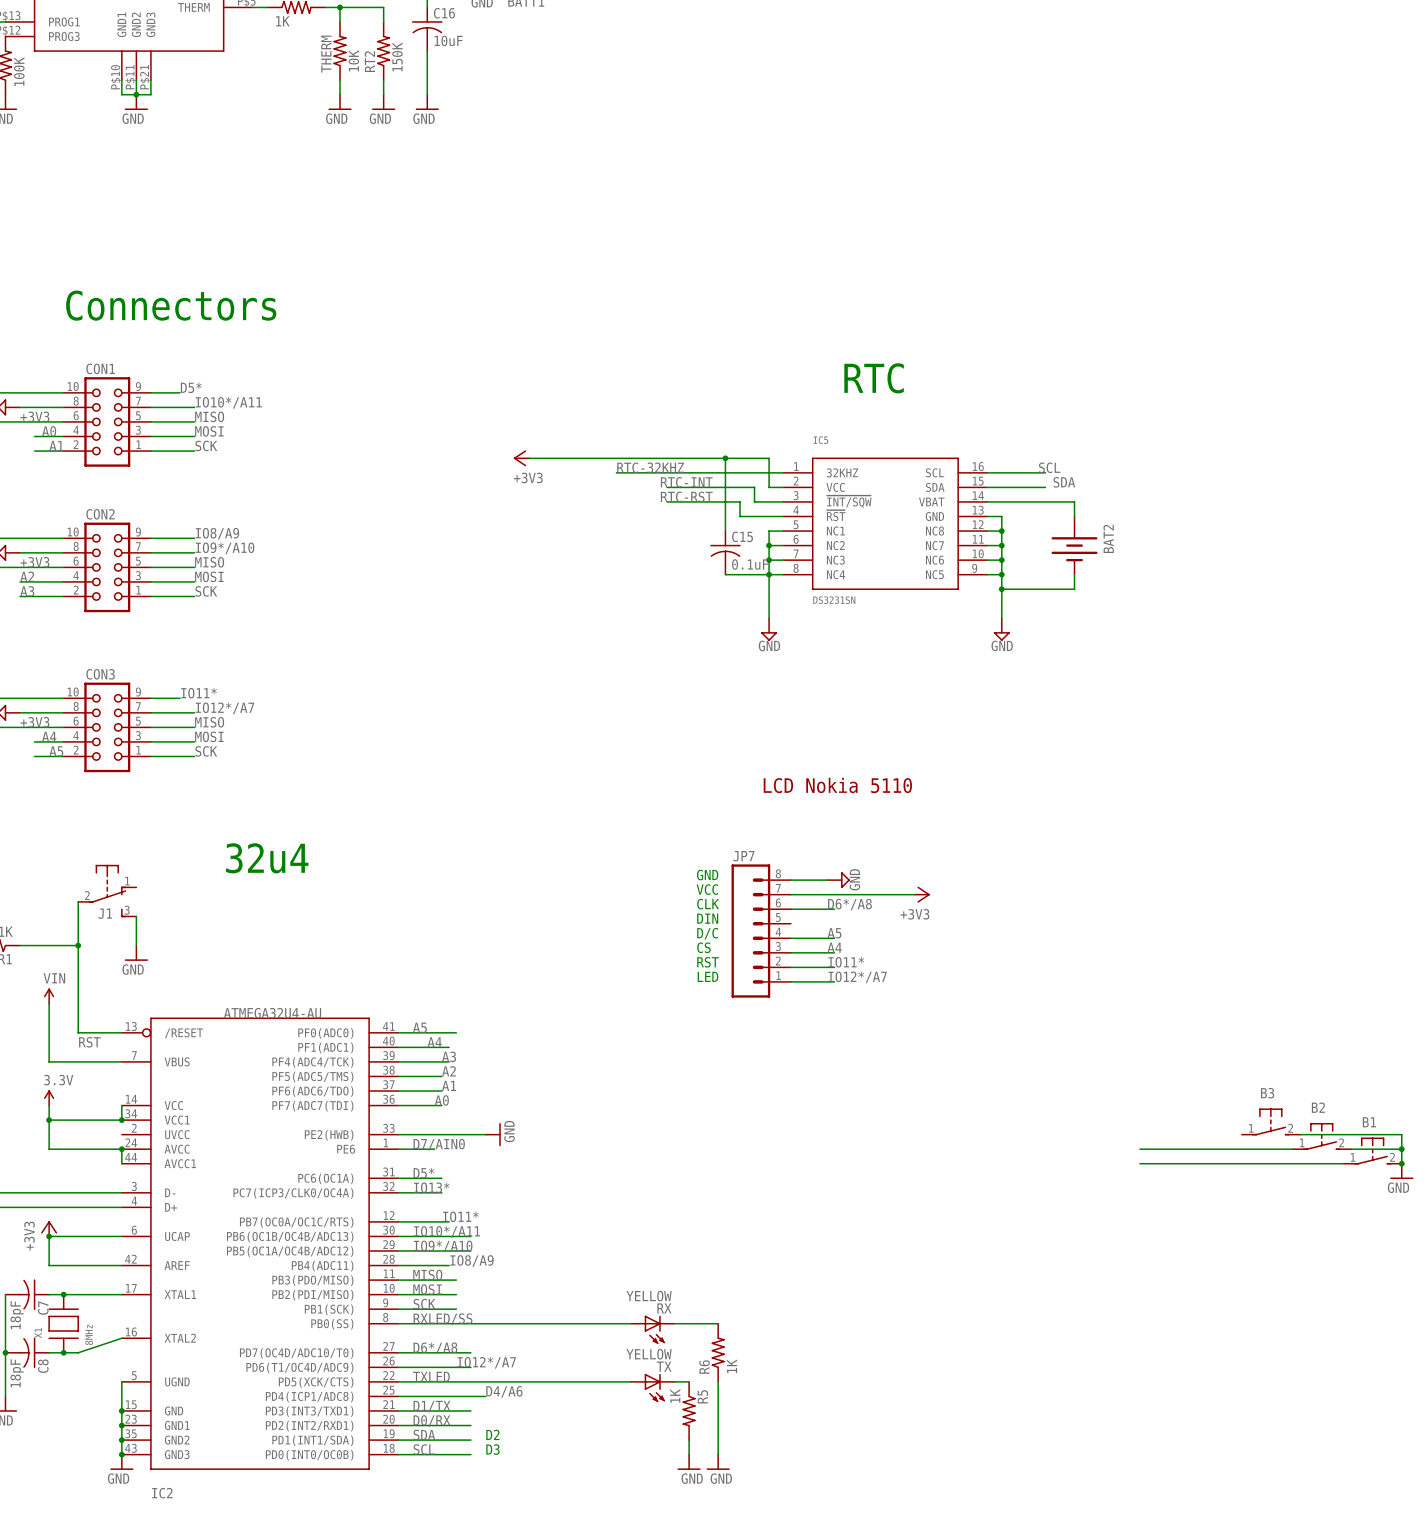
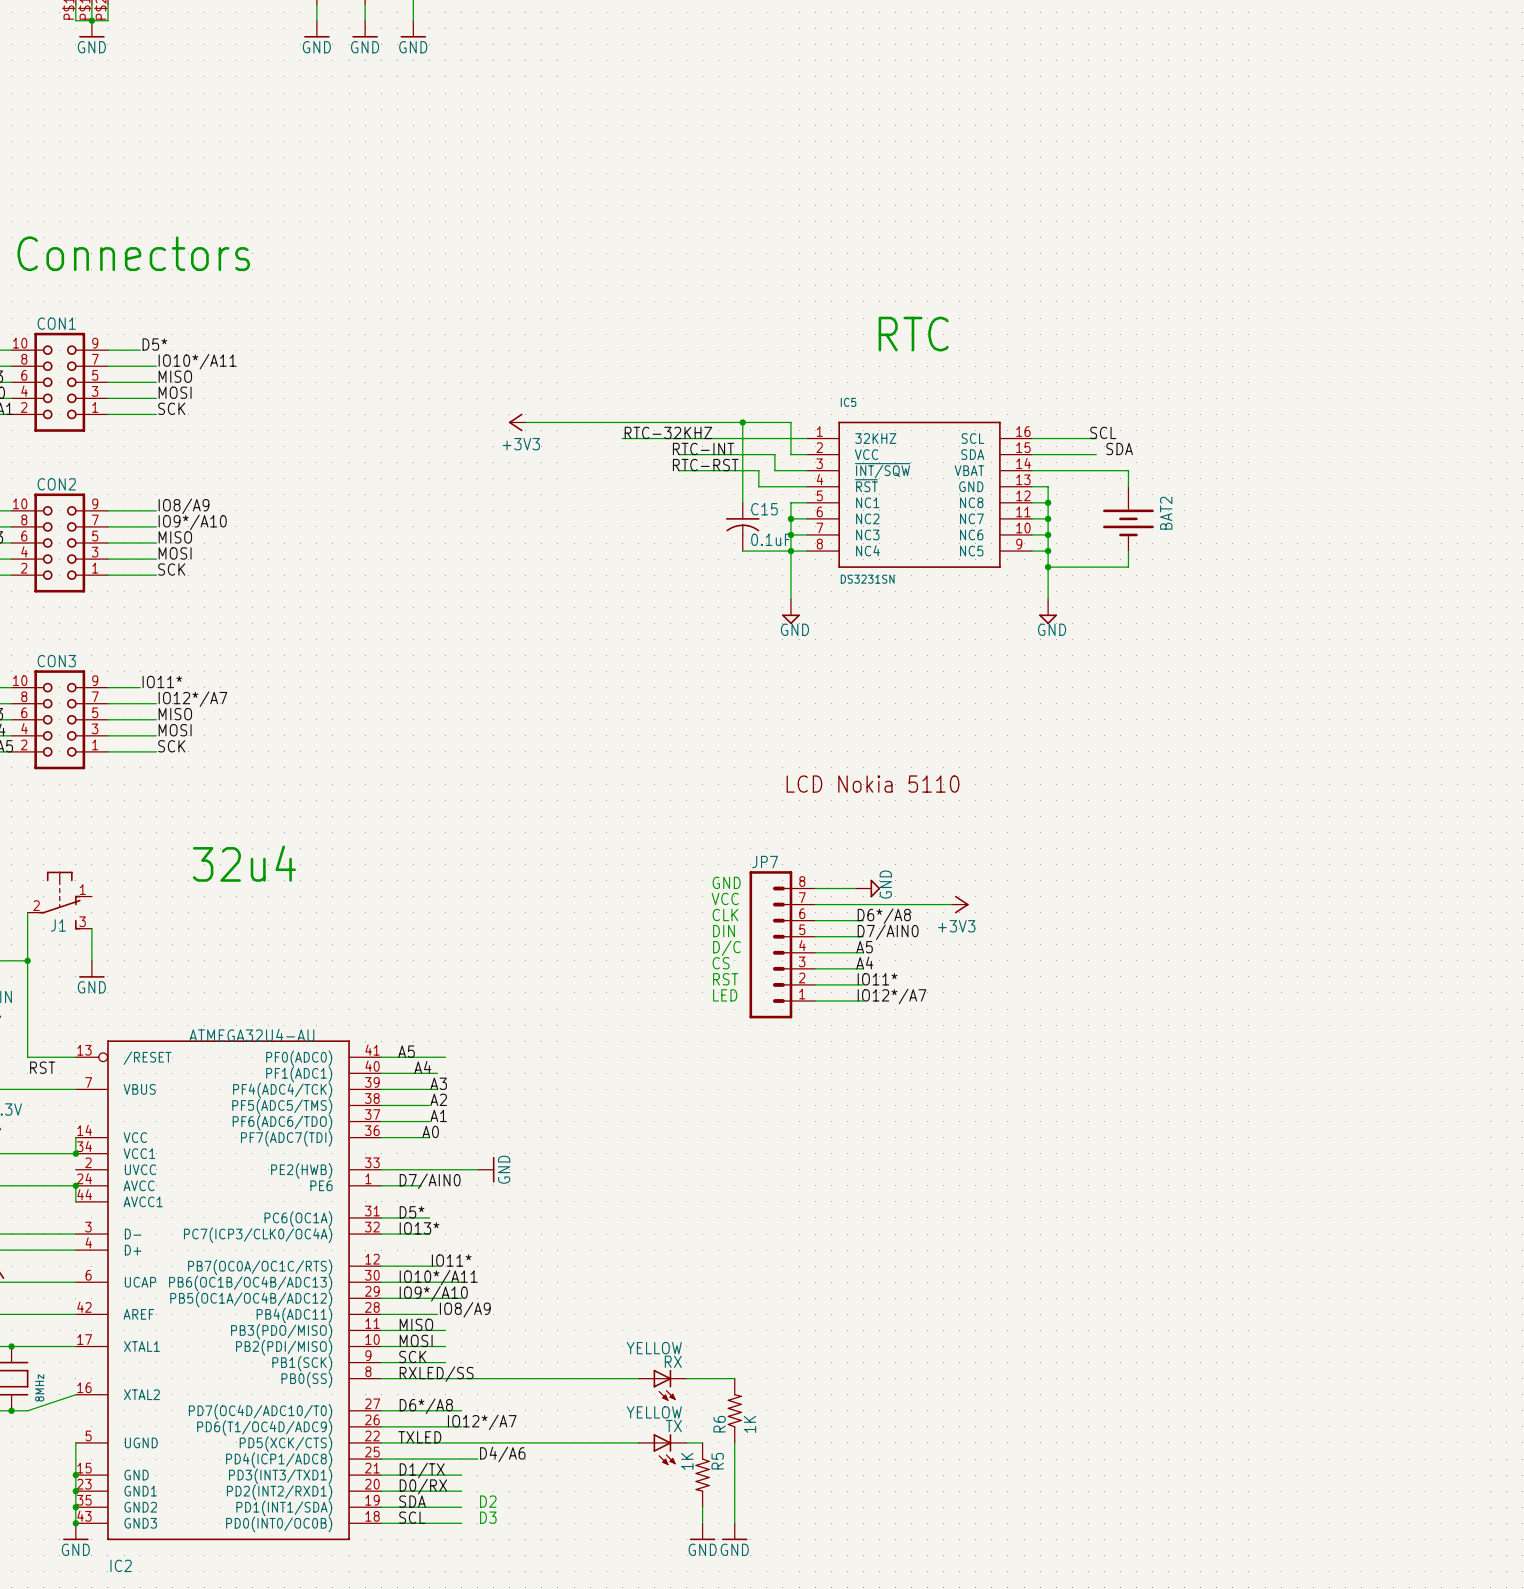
label: none -> D7/AIN0 (888, 932)
wire: none -> (815, 936) (863, 936)
B3: (1270, 1121) -> none
wire: (1299, 1134) (1401, 1134) (1401, 1163) -> none
B2: (1321, 1136) -> none
wire: (1139, 1149) (1292, 1149) -> none
wire: (1350, 1149) (1401, 1149) -> none
junction: (1401, 1149) -> none
B1: (1372, 1151) -> none
wire: (1139, 1163) (1343, 1163) -> none
junction: (1401, 1163) -> none
power symbol: GND (1401, 1171) -> none

